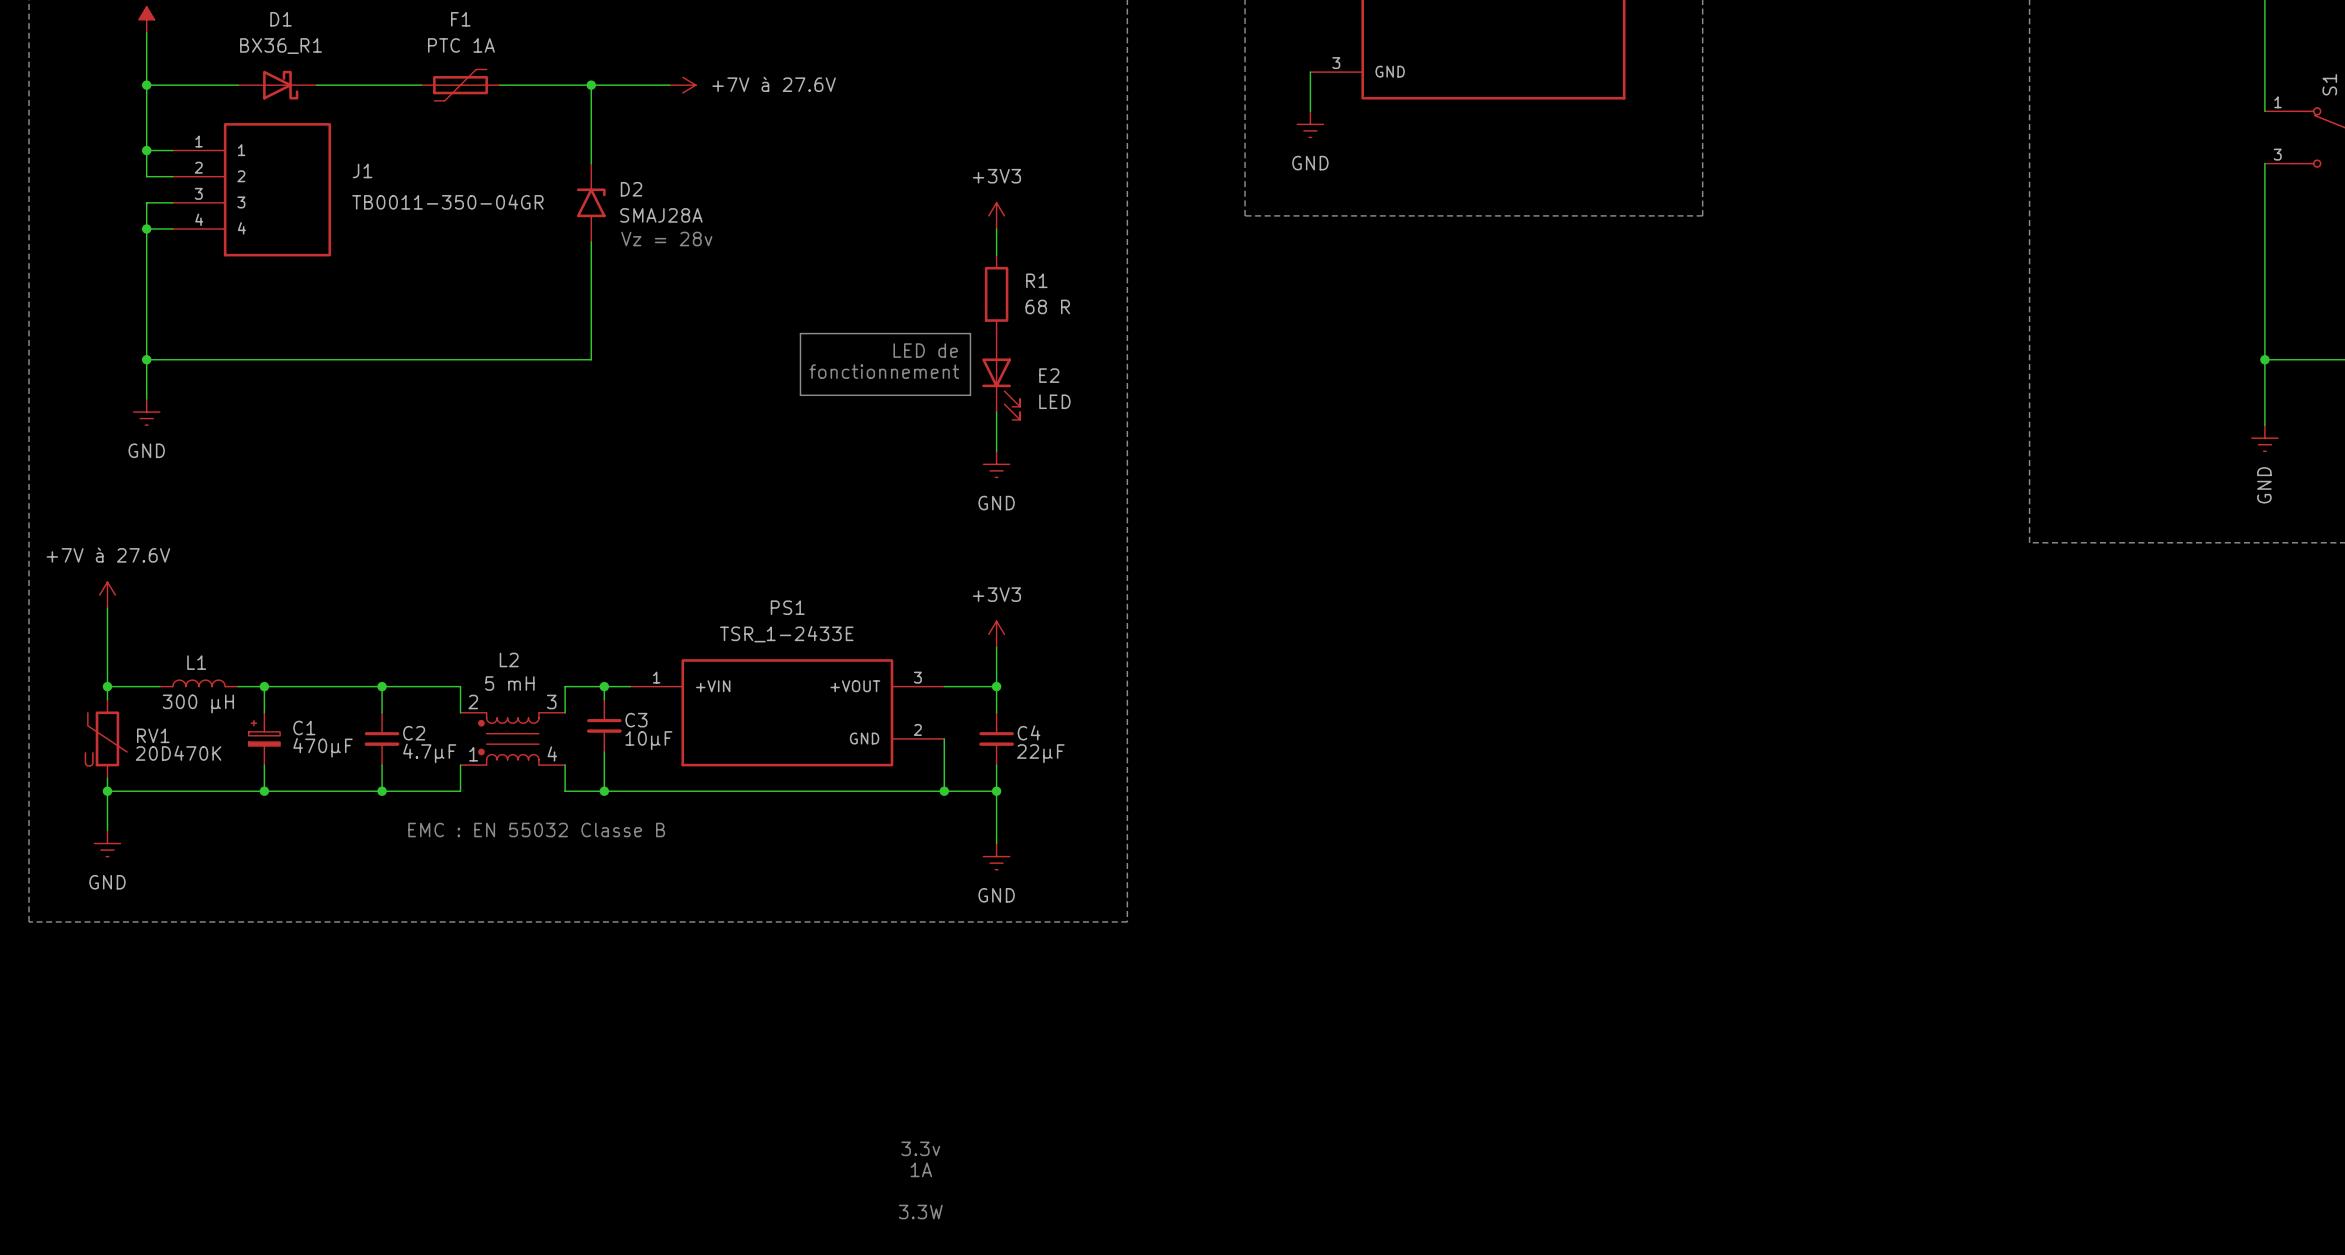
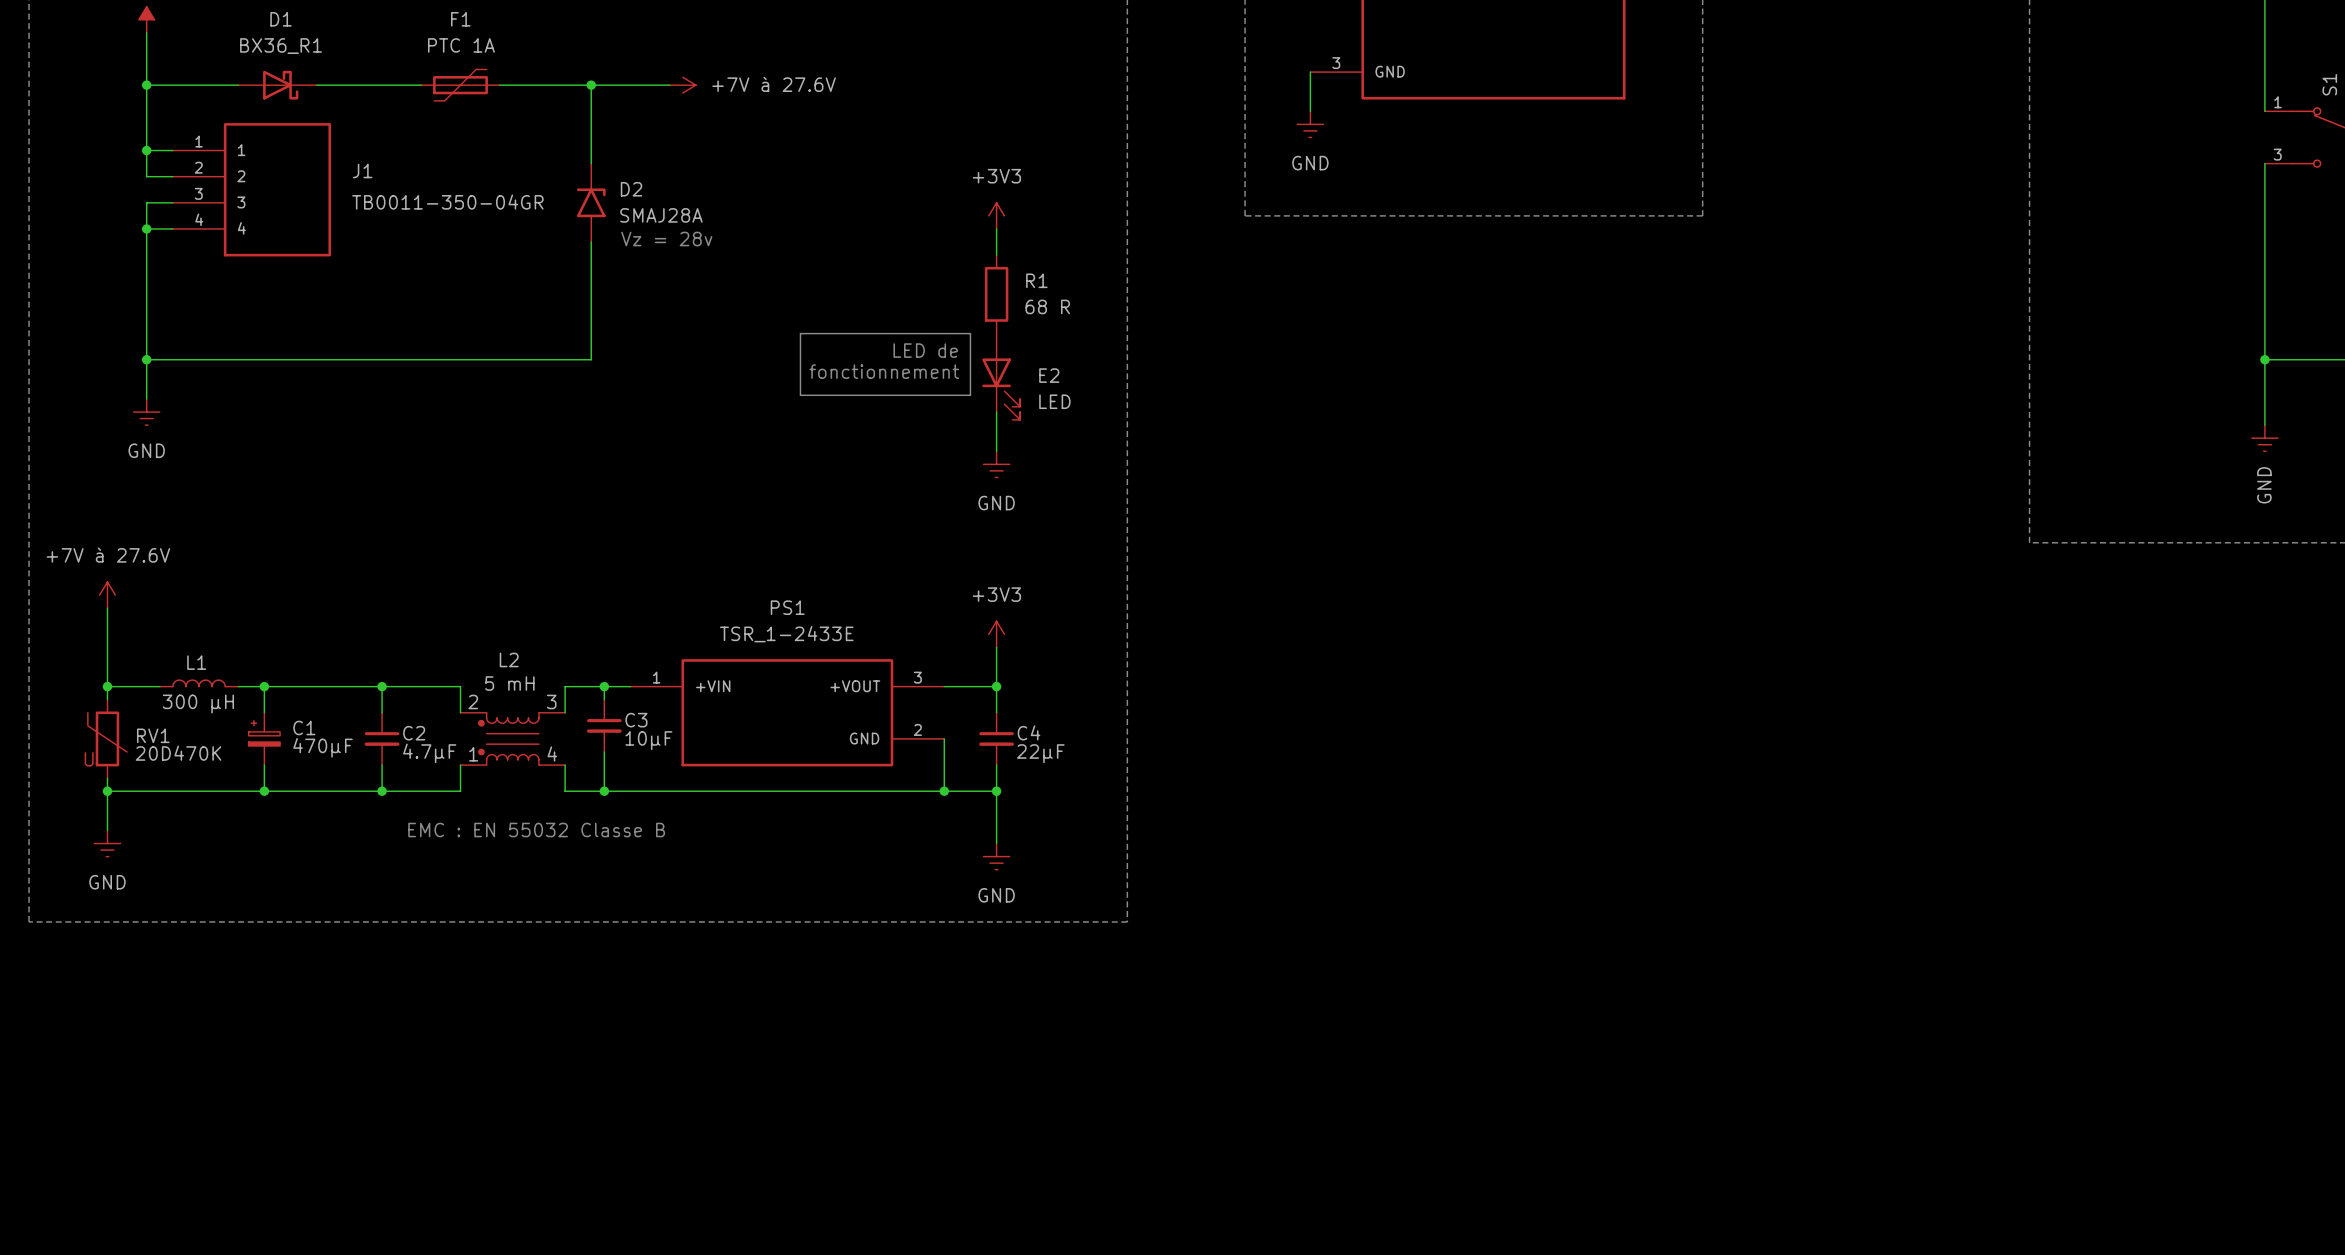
text: 3.3v (920, 1148) -> none
text: 1A (921, 1169) -> none
text: 3.3W (920, 1212) -> none

